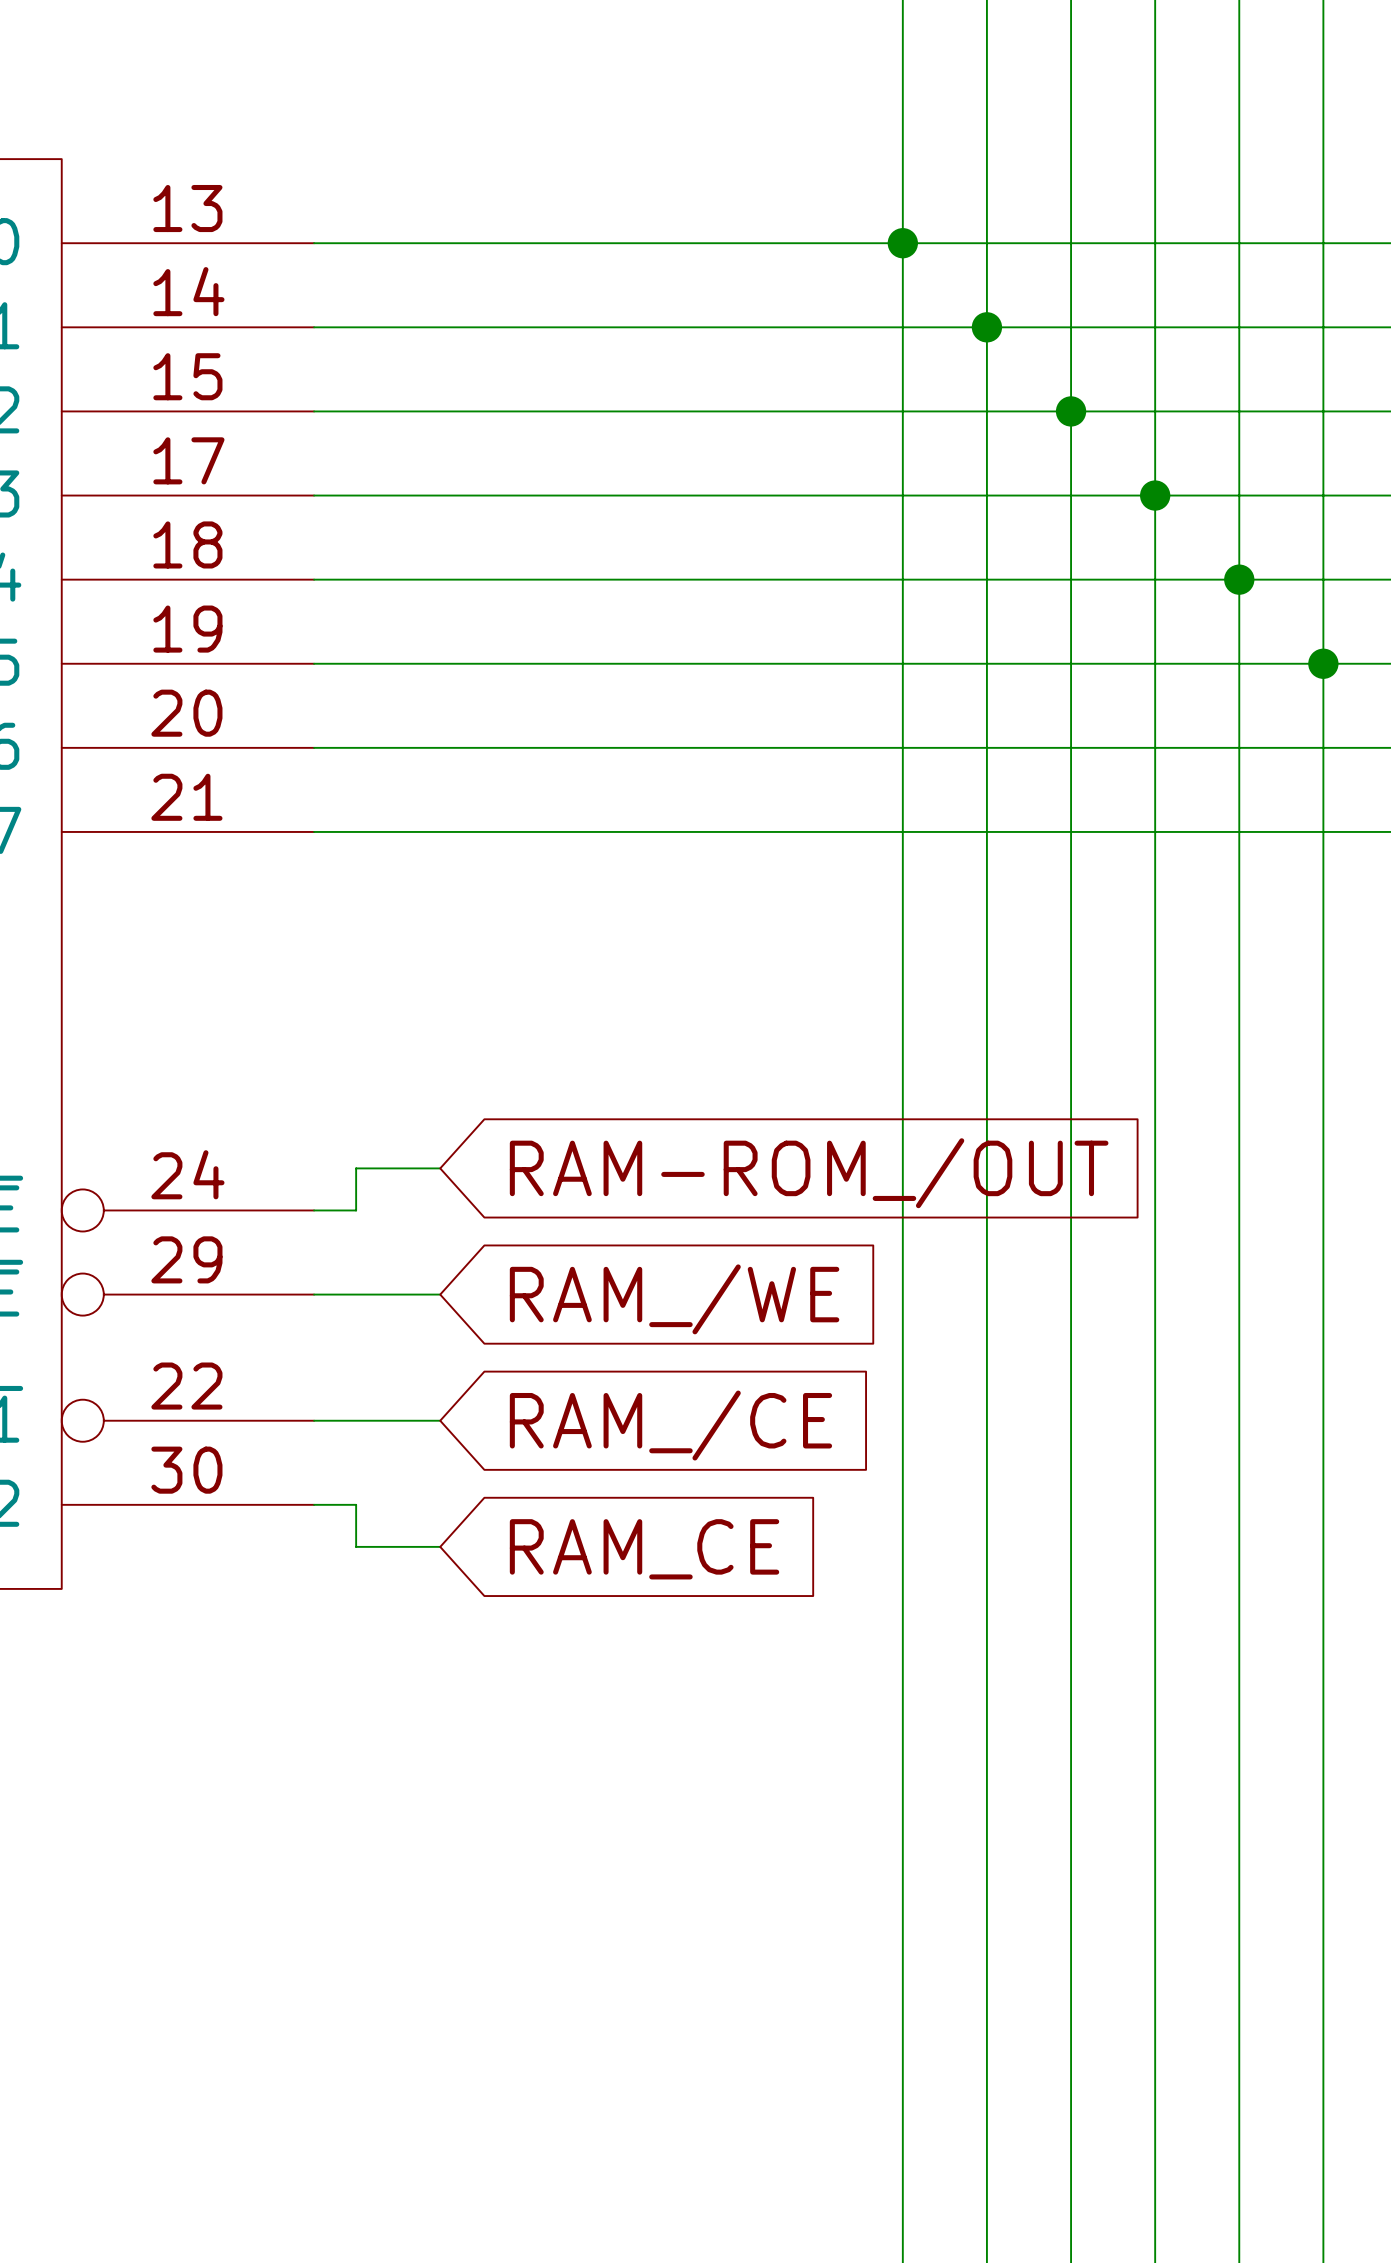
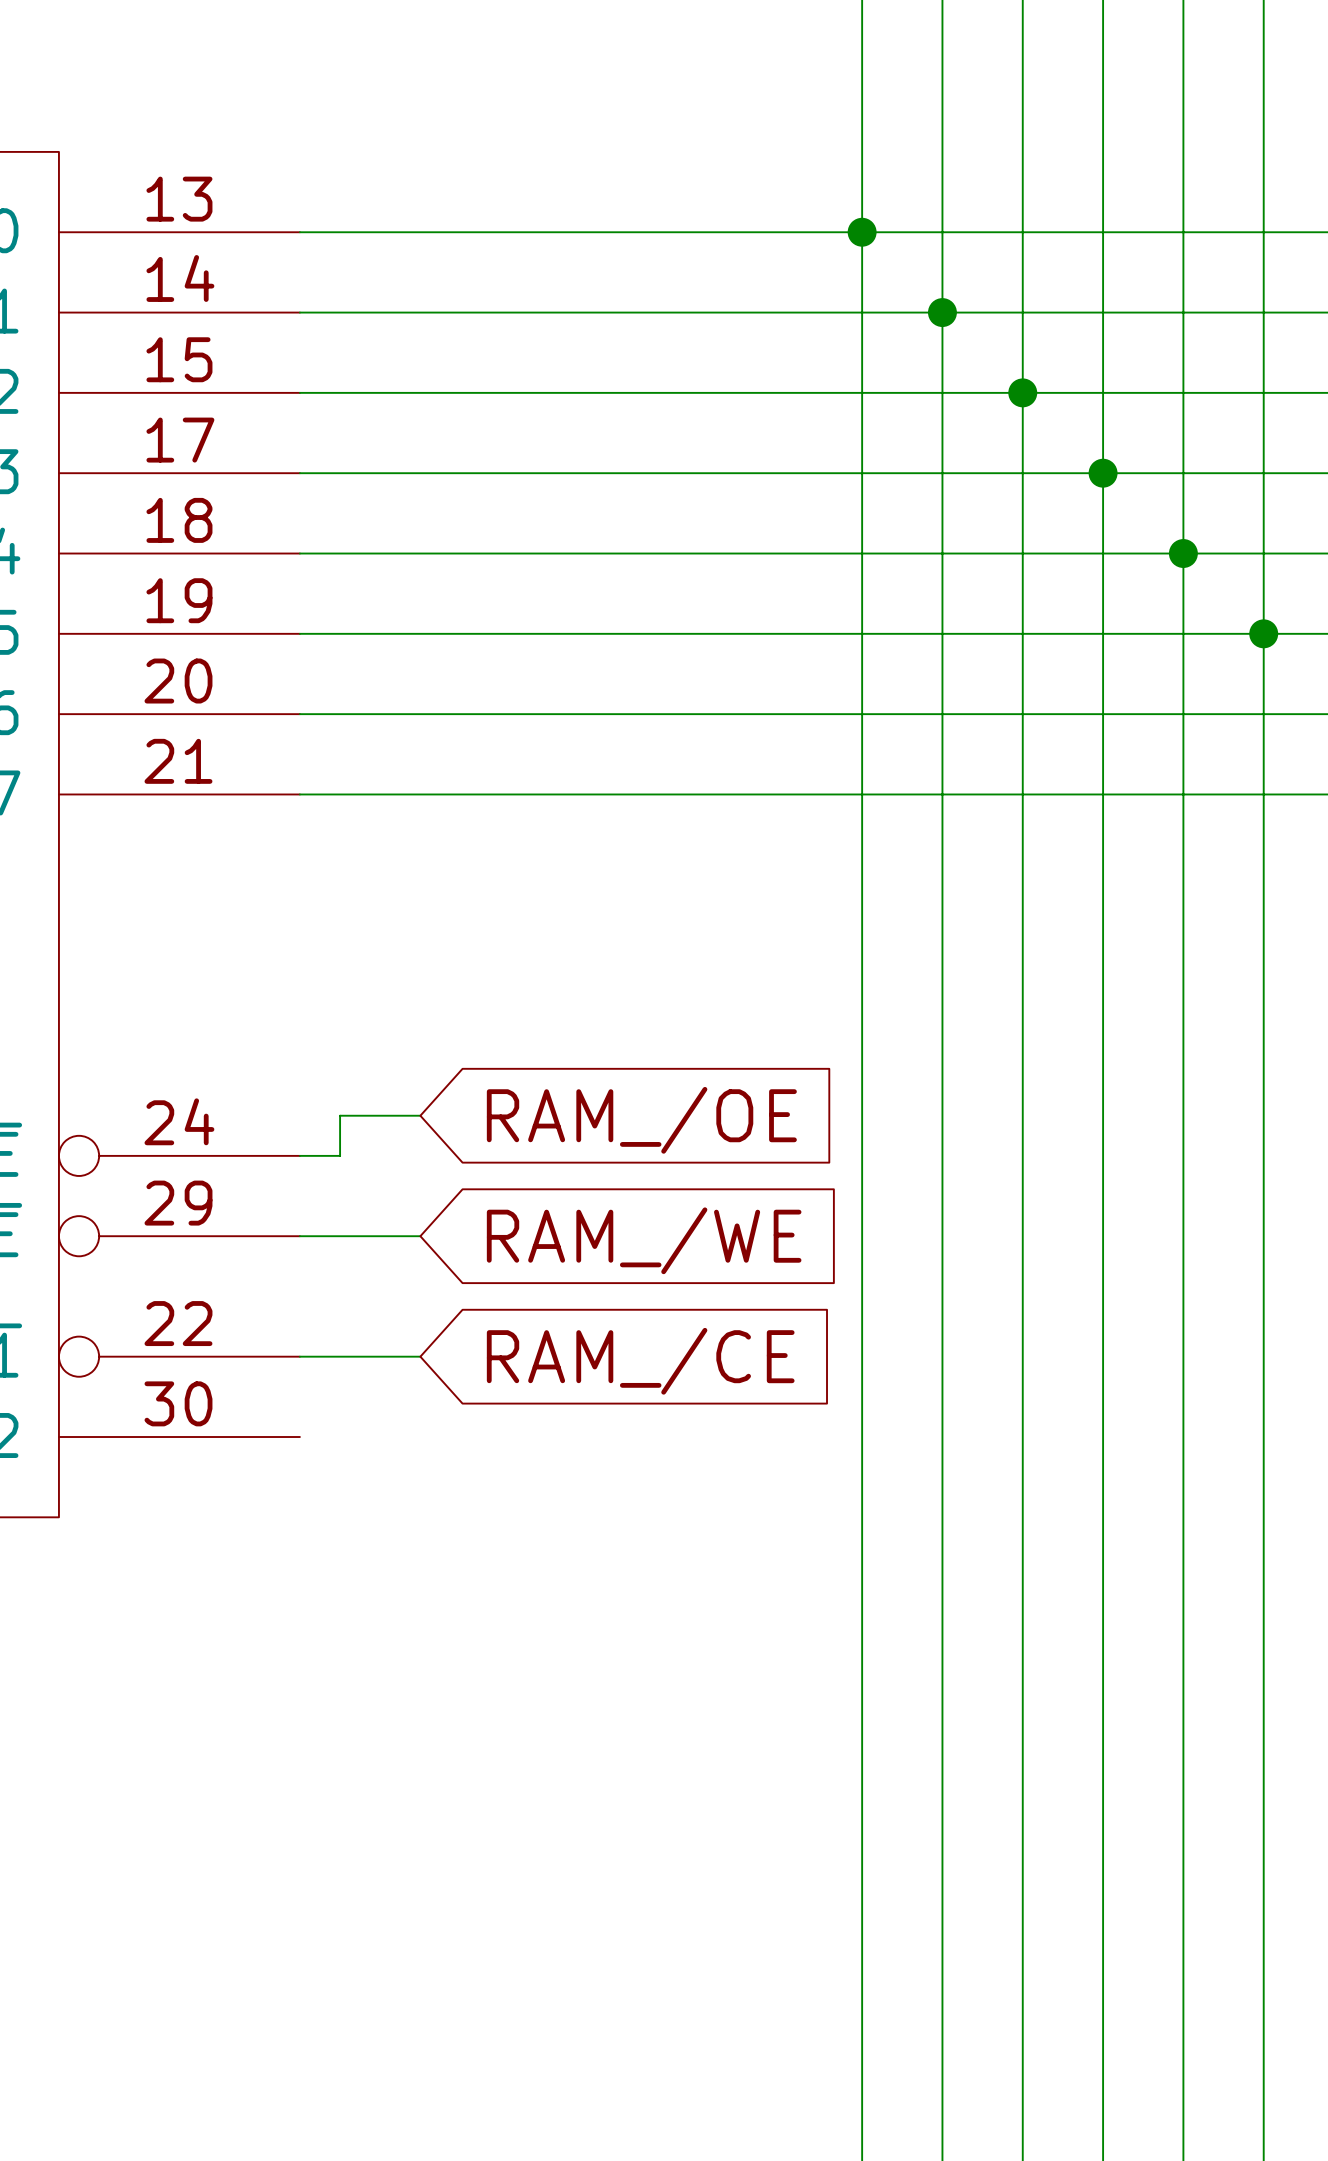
global label: RAM-ROM_/OUT (809, 1173) -> RAM_/OE (641, 1120)
wire: (314, 1504) (356, 1504) (356, 1546) (440, 1546) -> none
global label: RAM_CE (644, 1549) -> none

